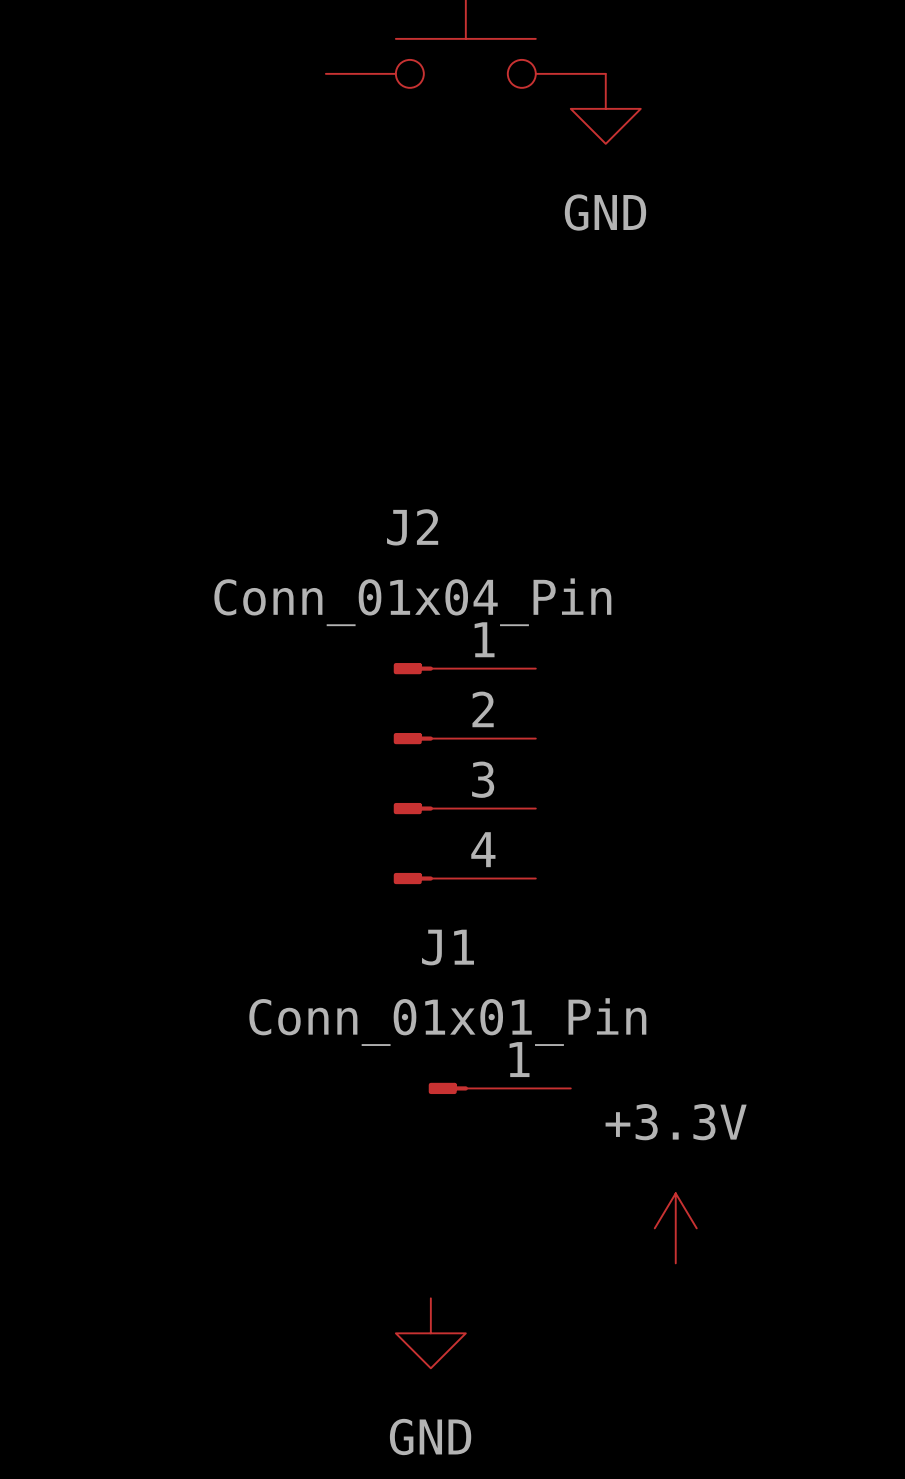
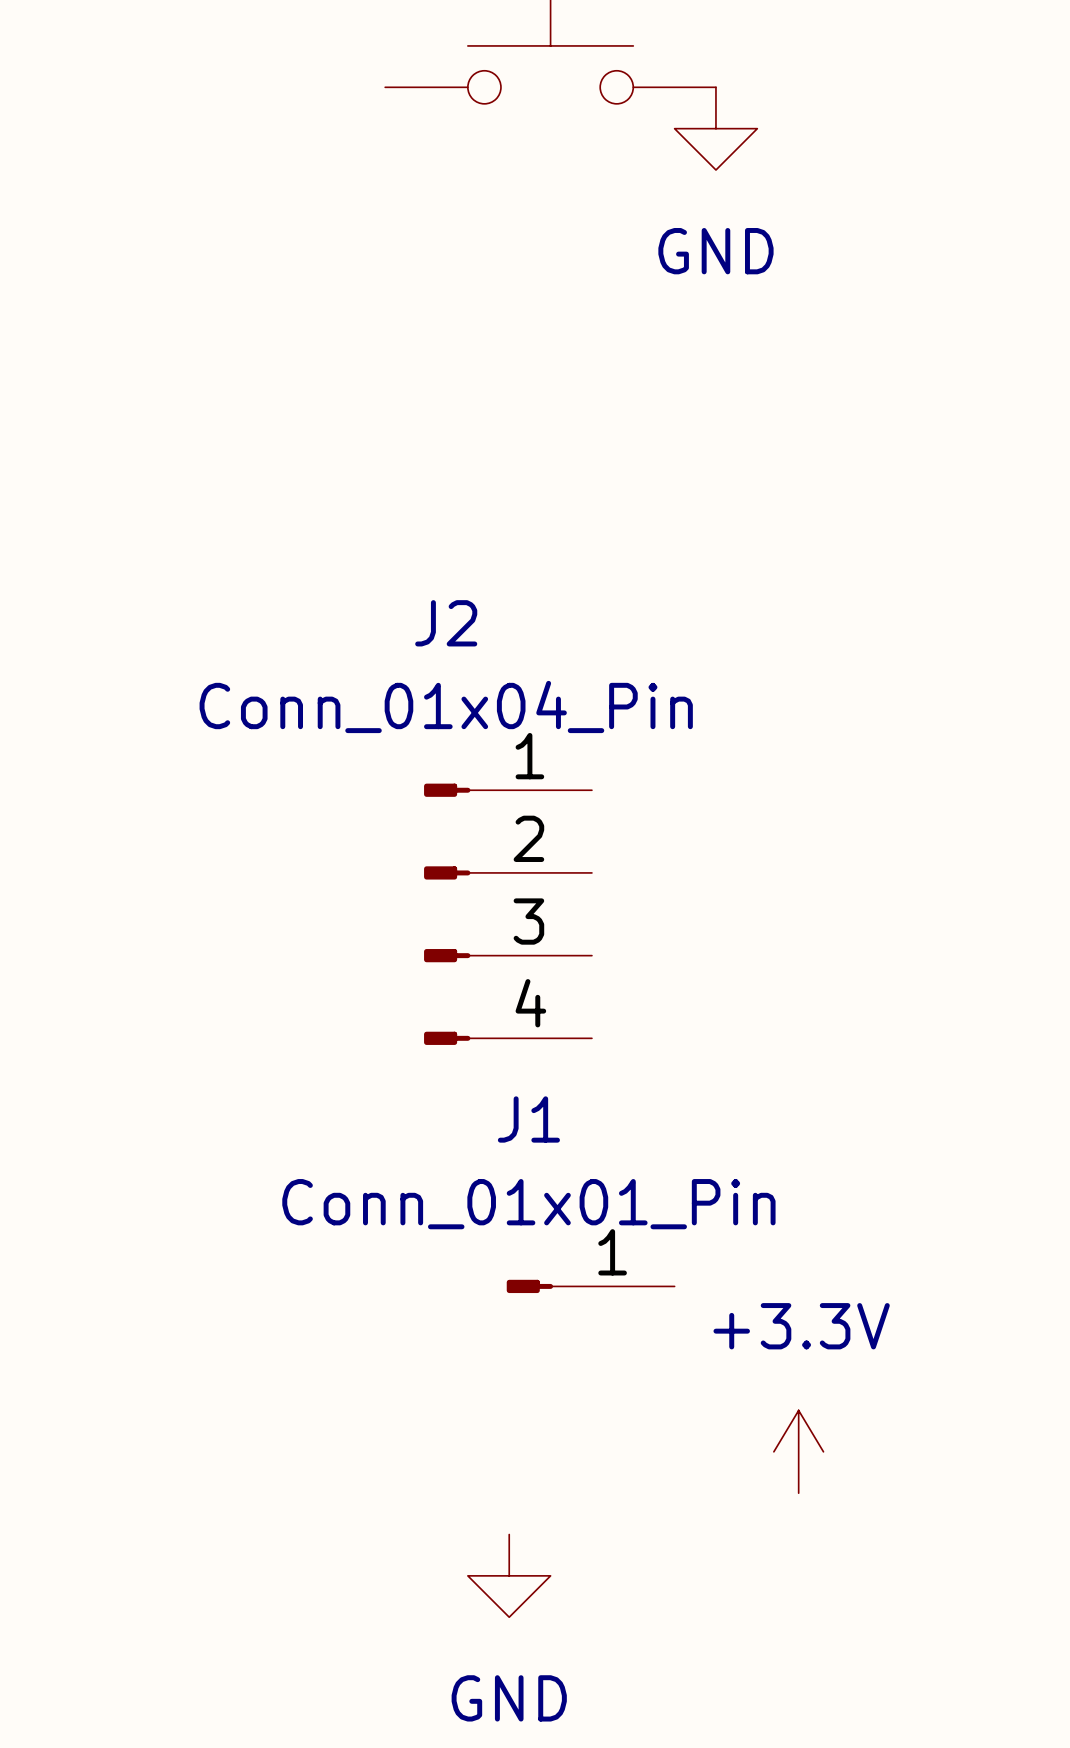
J2 position: (464, 773) -> (507, 914)

